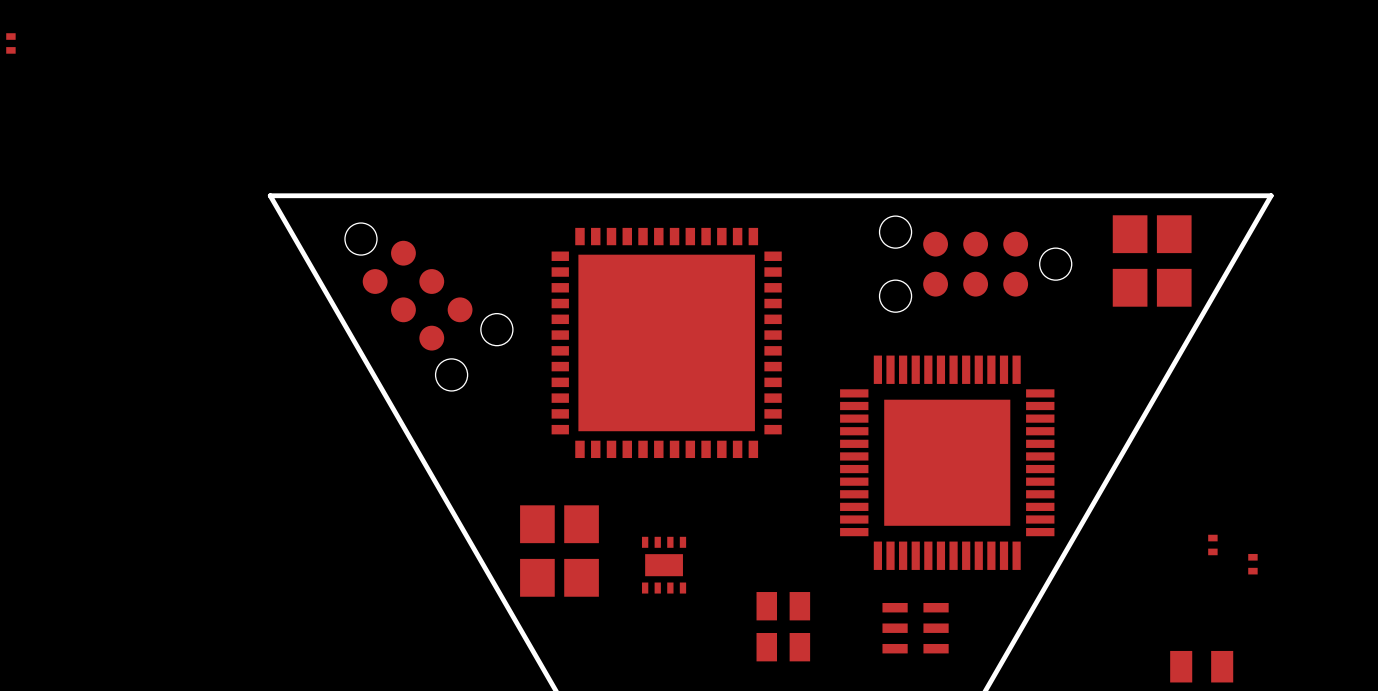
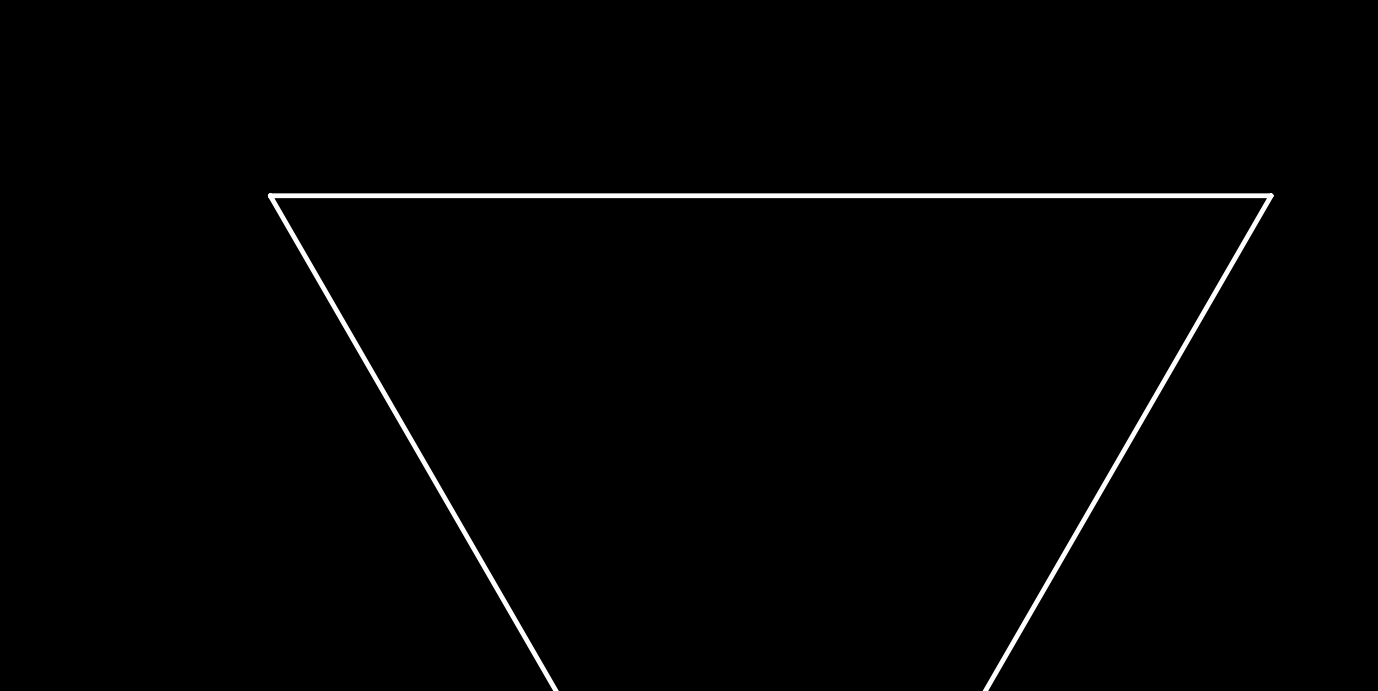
part: (10, 43) -> none
part: (1152, 260) -> none
part: (975, 264) -> none
part: (428, 306) -> none
part: (666, 342) -> none
part: (947, 462) -> none
part: (1212, 544) -> none
part: (559, 551) -> none
part: (1252, 564) -> none
part: (664, 565) -> none
part: (783, 626) -> none
part: (915, 628) -> none
part: (1201, 666) -> none

